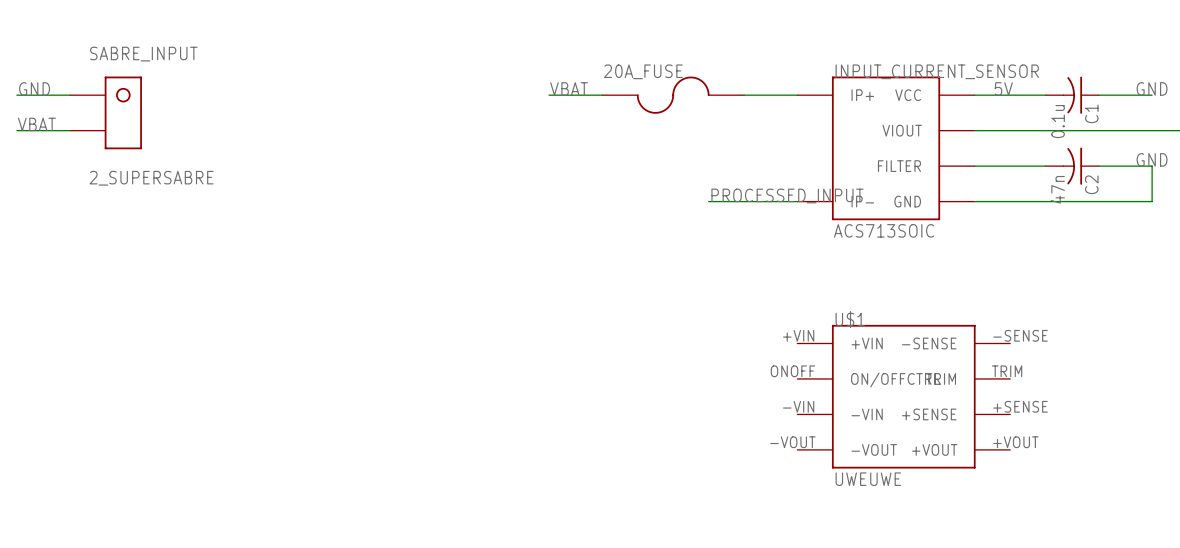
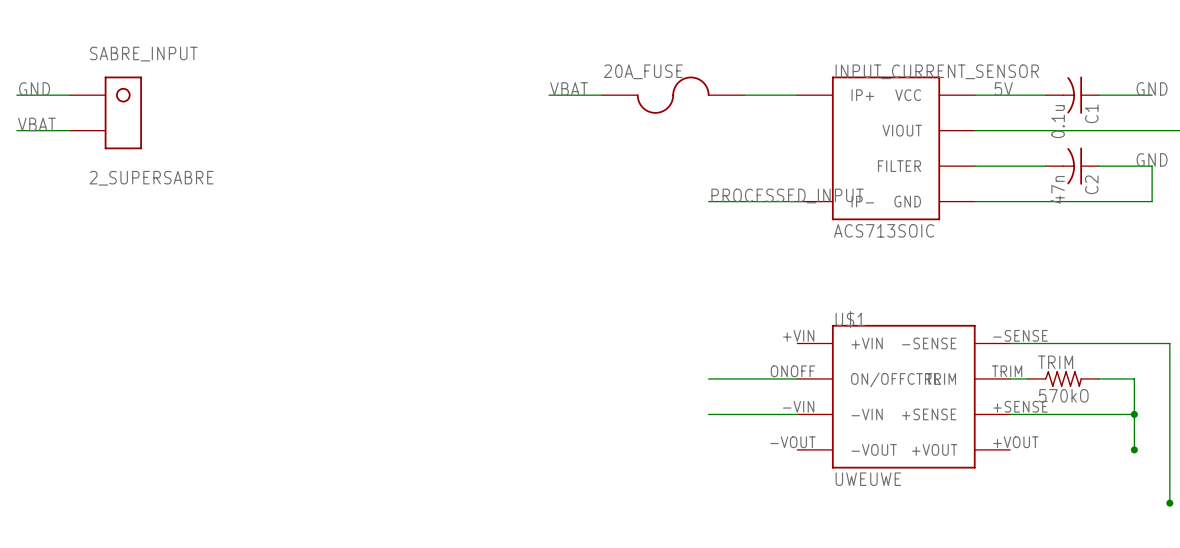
wire: none -> (1010, 343) (1169, 343) (1169, 503)
wire: none -> (708, 378) (797, 378)
wire: none -> (1010, 378) (1027, 378)
TRIM: none -> 570kO (1063, 378)
wire: none -> (1098, 378) (1134, 378) (1134, 449)
wire: none -> (708, 414) (797, 414)
wire: none -> (1010, 414) (1134, 414)
junction: none -> (1134, 414)
junction: none -> (1134, 449)
junction: none -> (1169, 503)

